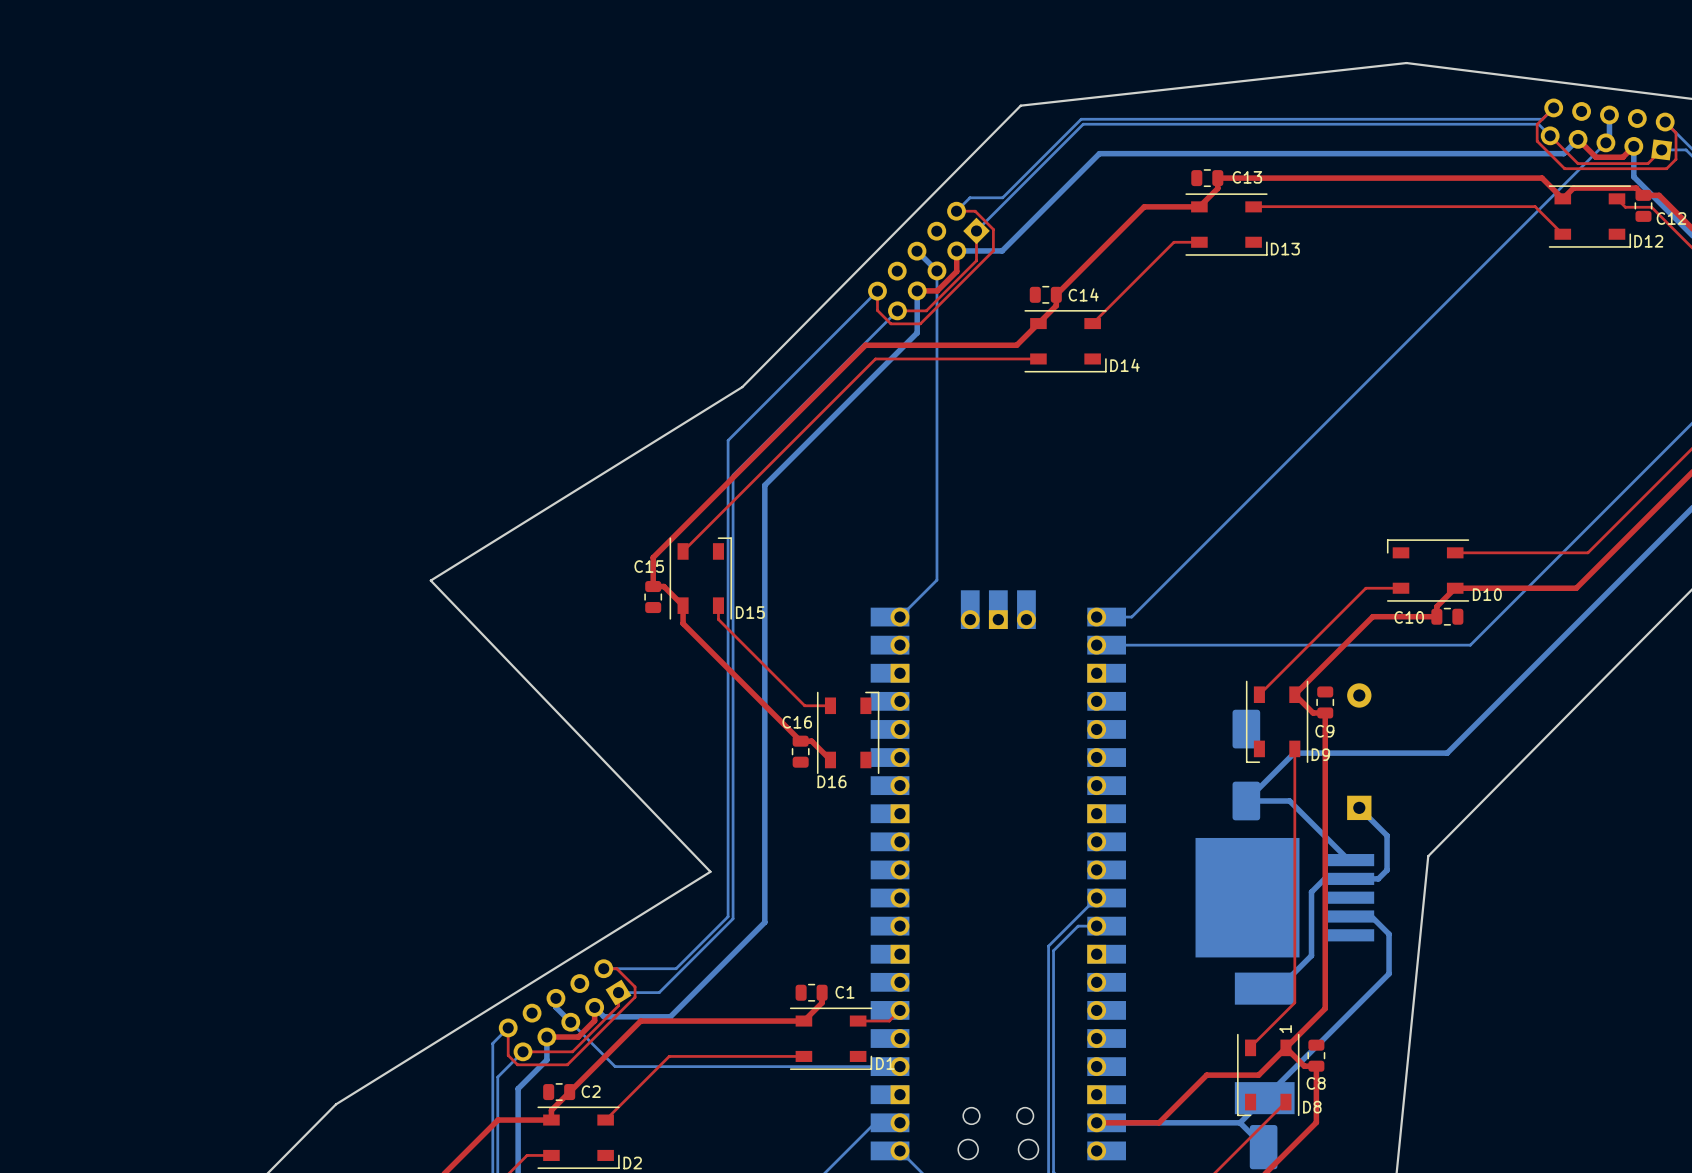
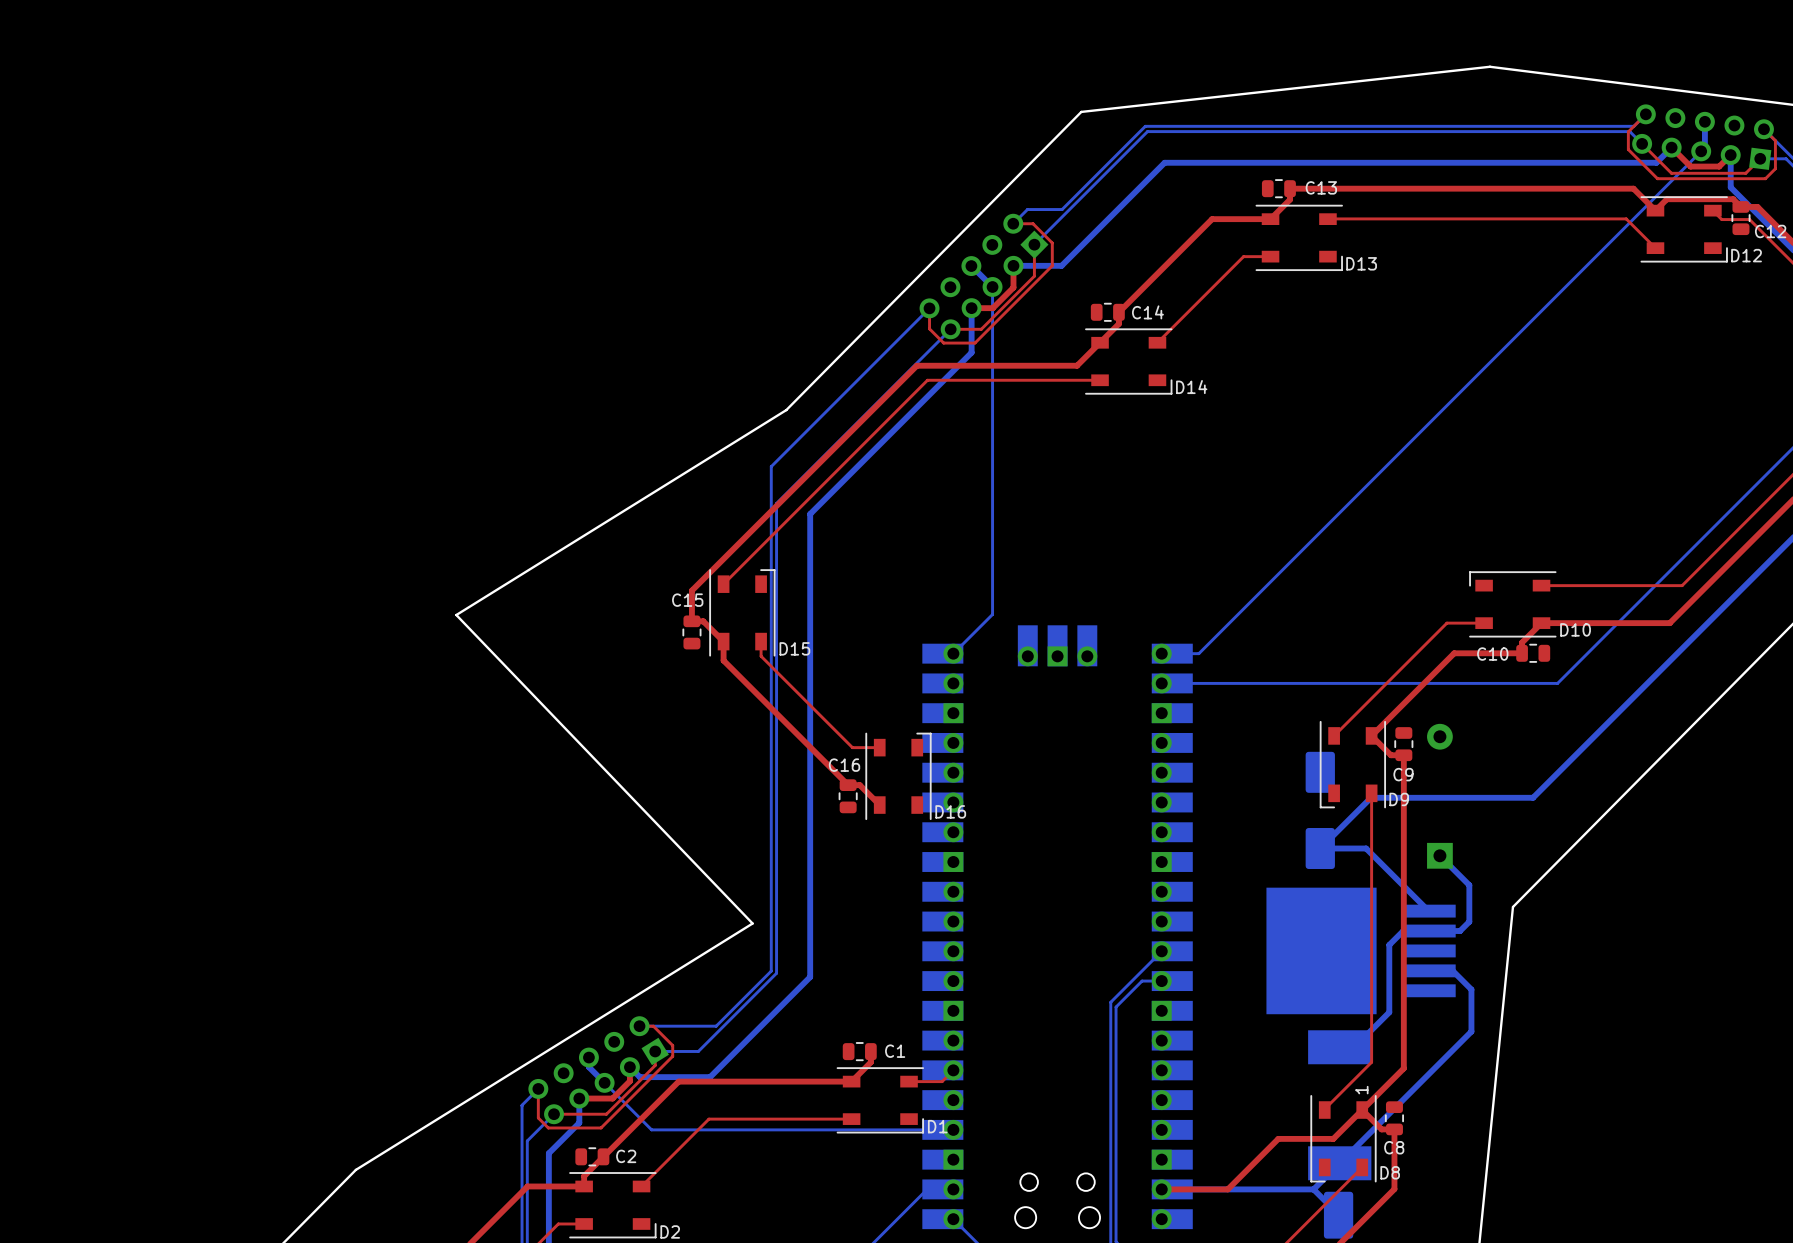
D16 name position: D16 (832, 781) -> D16 (950, 811)

